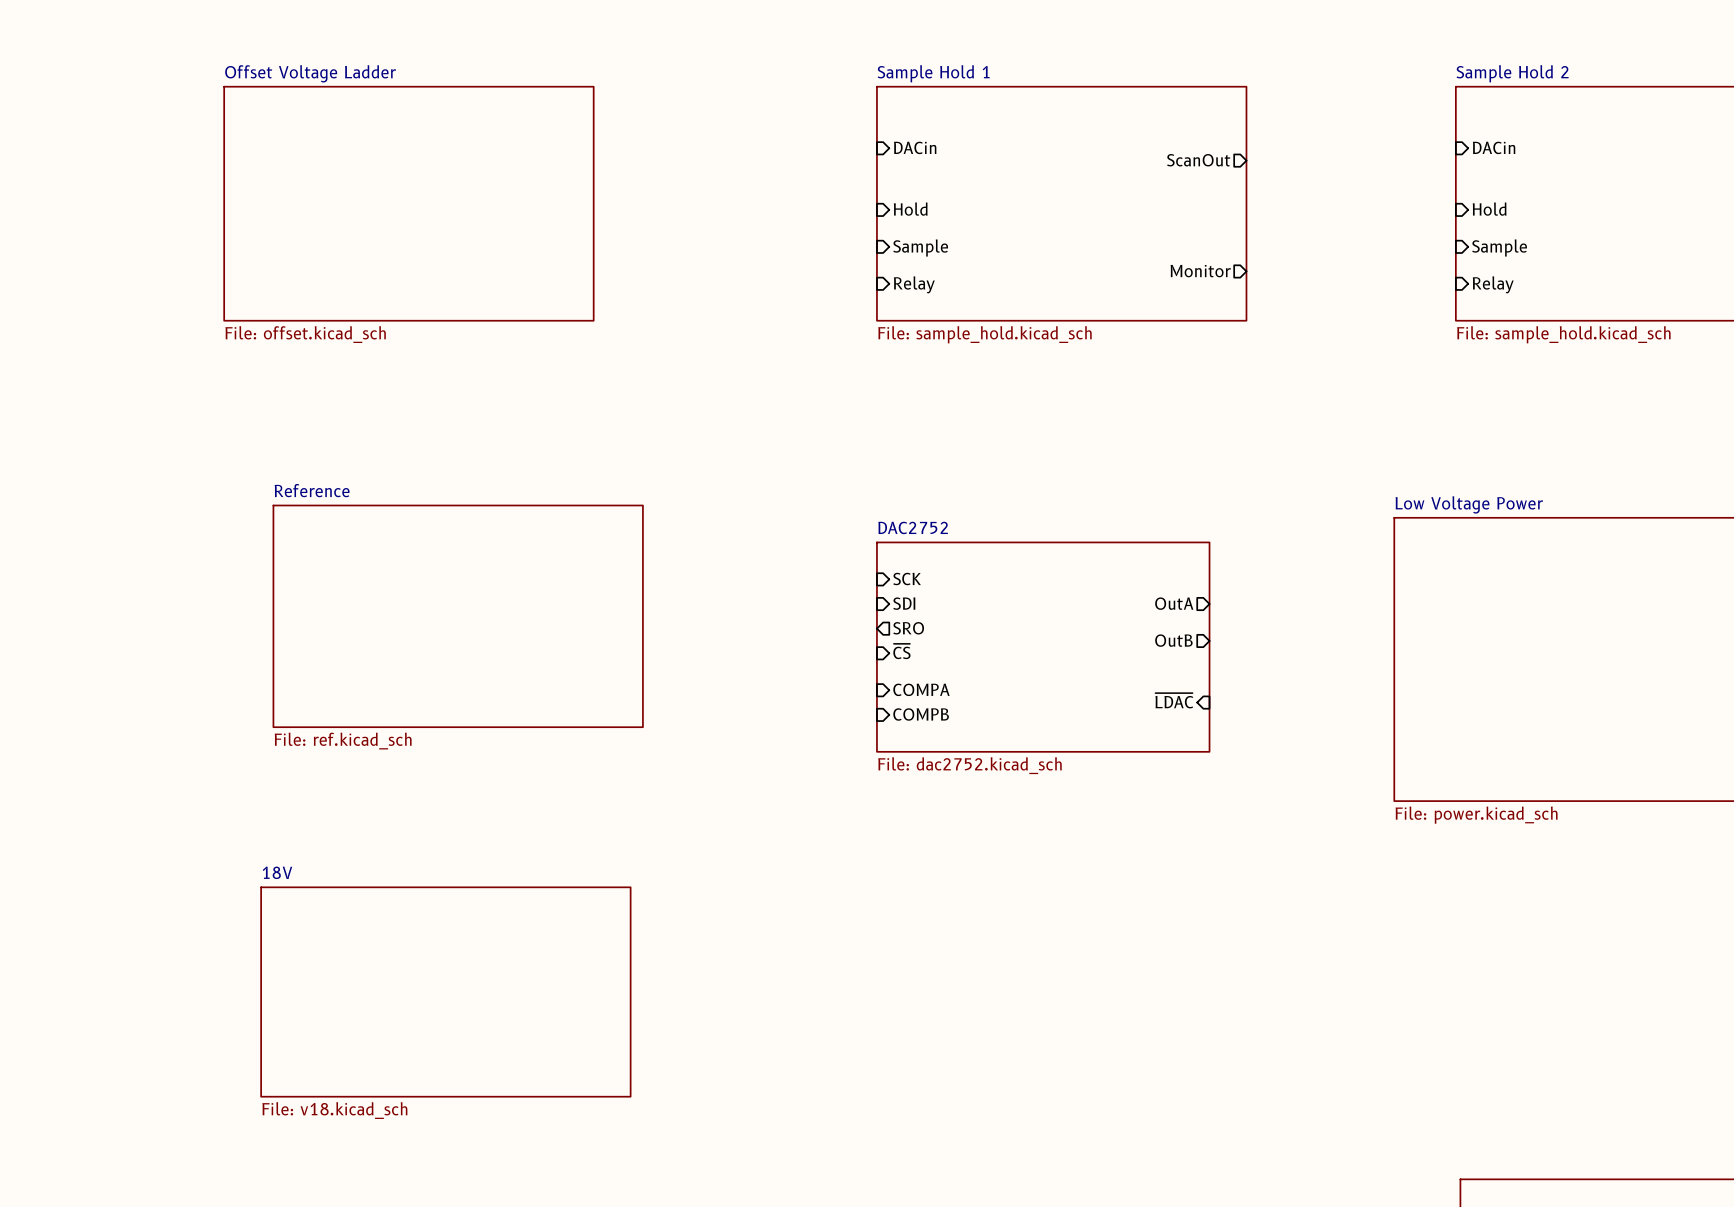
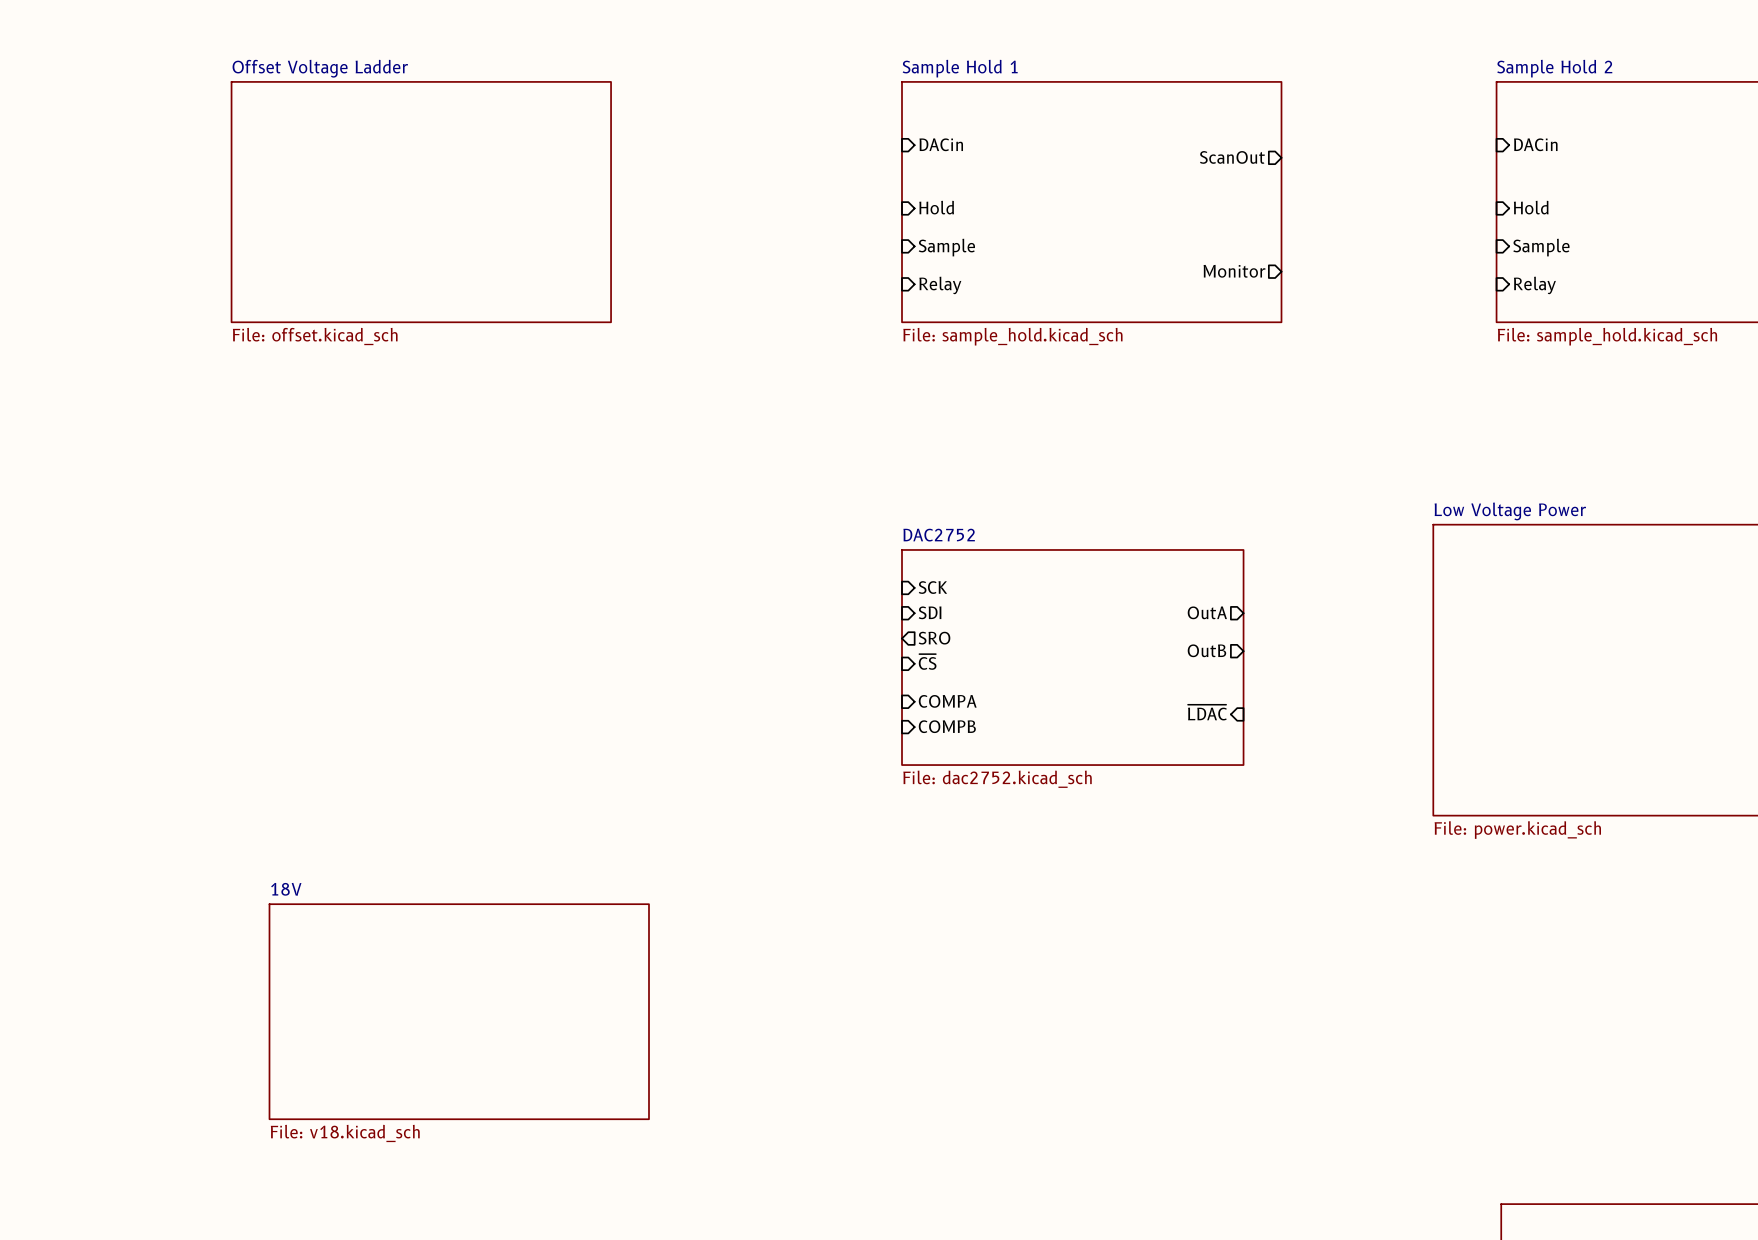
sheet Reference: File: ref.kicad_sch (458, 616) -> none

